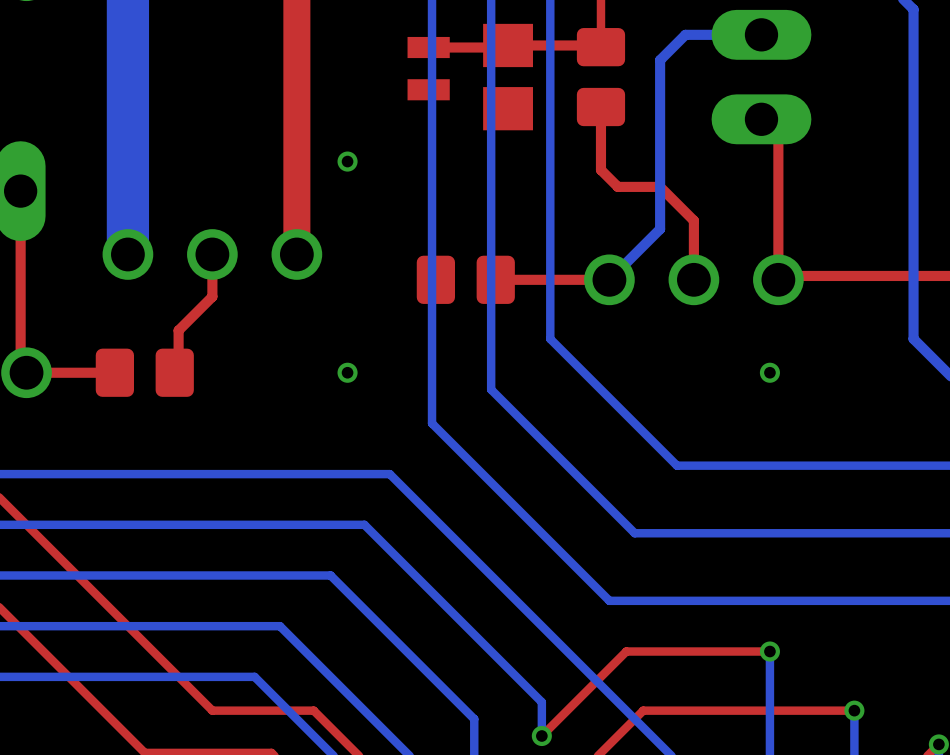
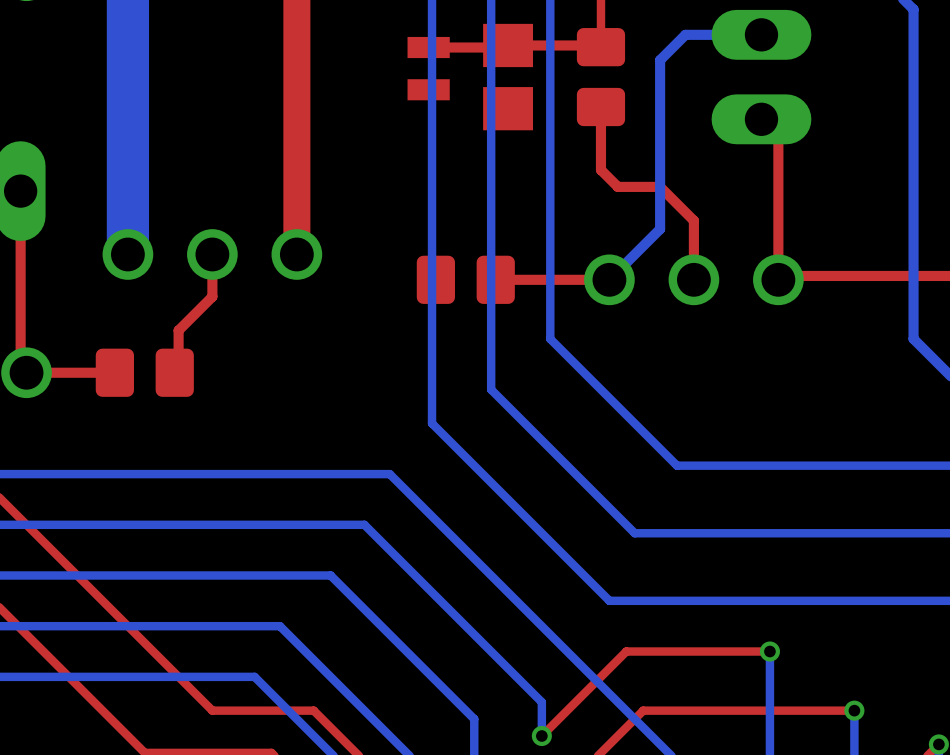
via: (347, 161) -> none
via: (347, 372) -> none
via: (769, 372) -> none

